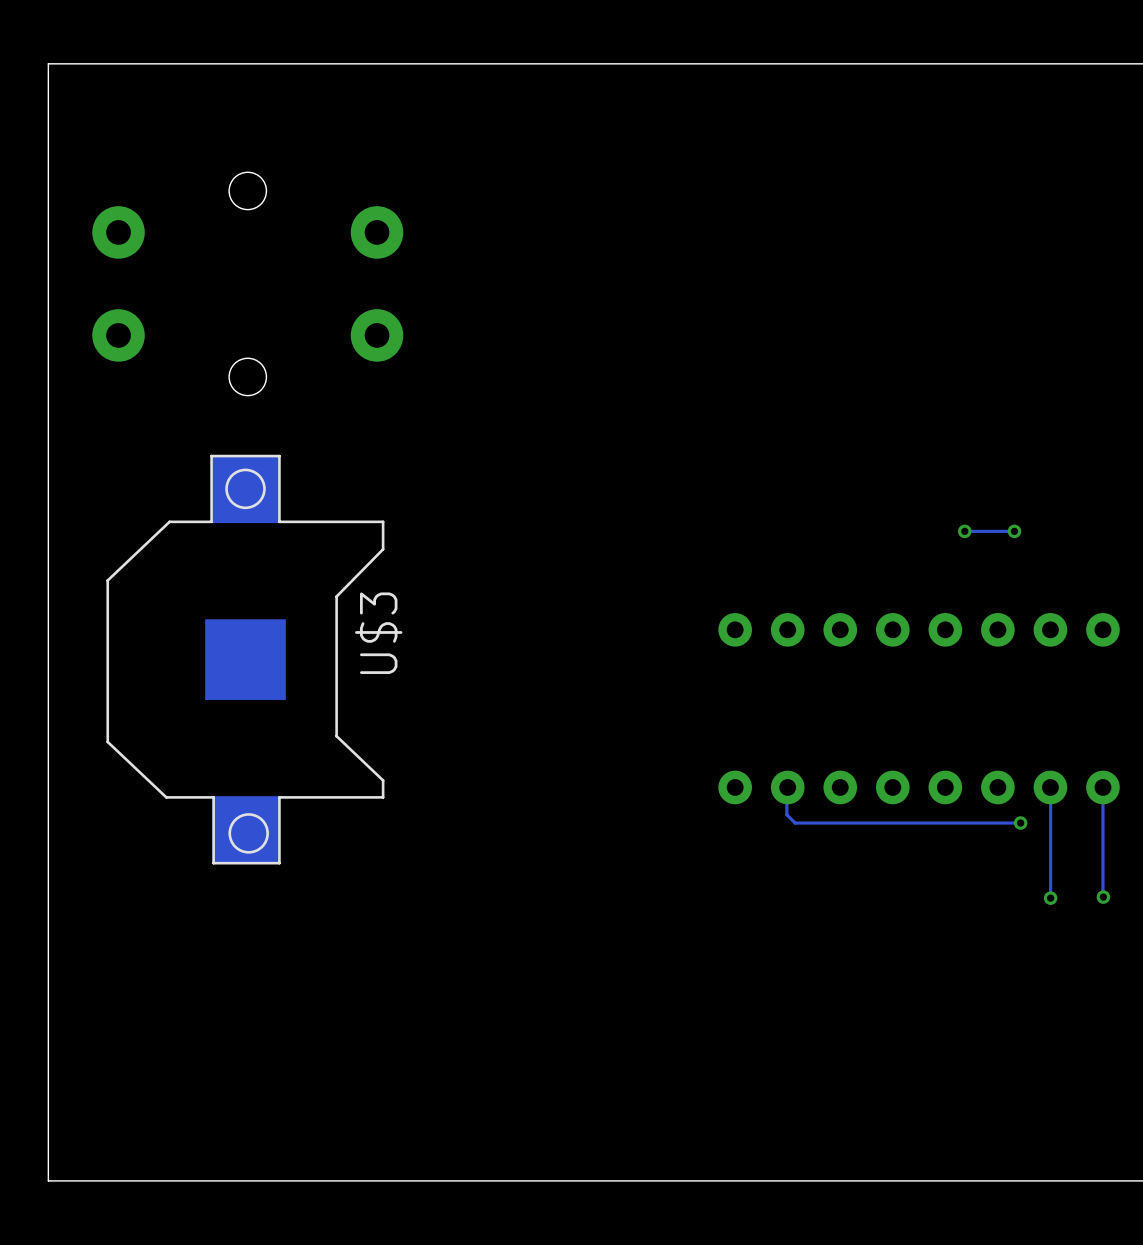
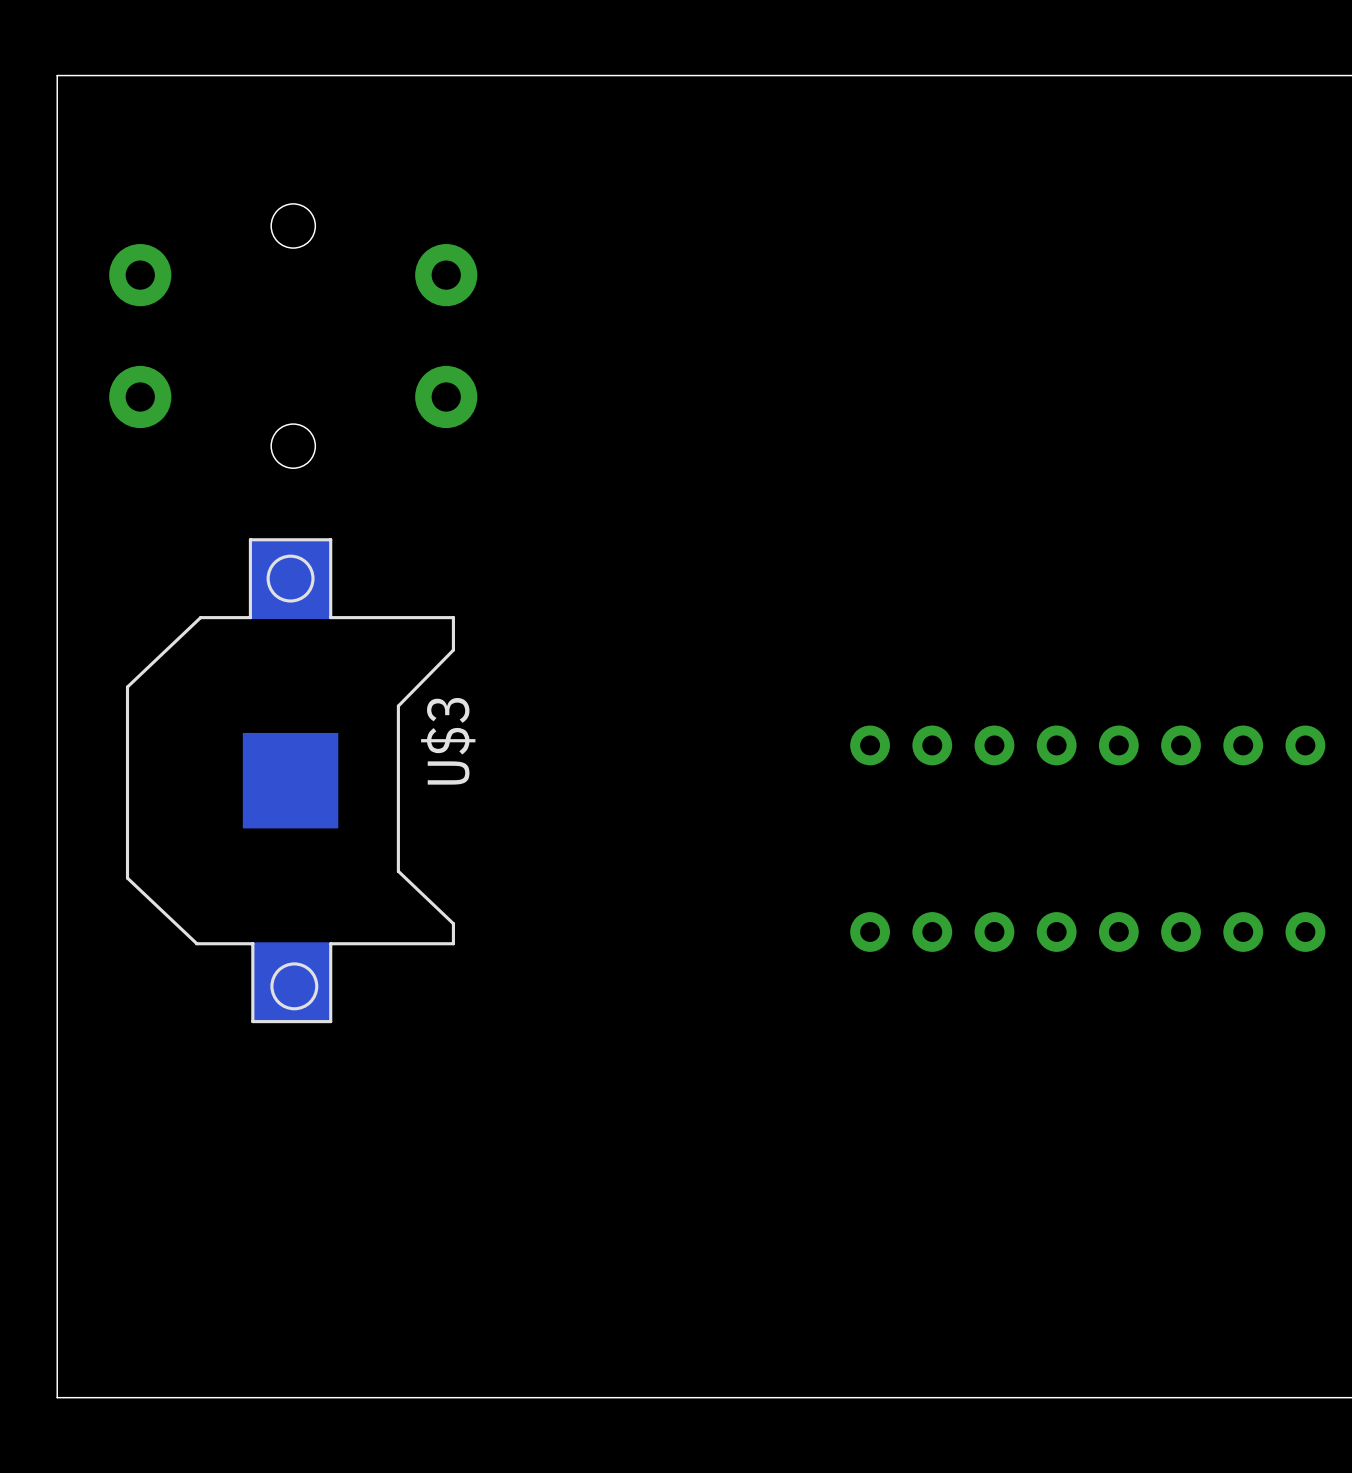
via: (964, 531) -> none
track: (1014, 531) (964, 531) -> none
via: (1014, 531) -> none
track: (787, 787) (786, 814) (795, 823) (1020, 823) -> none
track: (1050, 787) (1050, 898) -> none
track: (1102, 787) (1103, 896) -> none
via: (1020, 823) -> none
via: (1103, 897) -> none
via: (1050, 898) -> none

